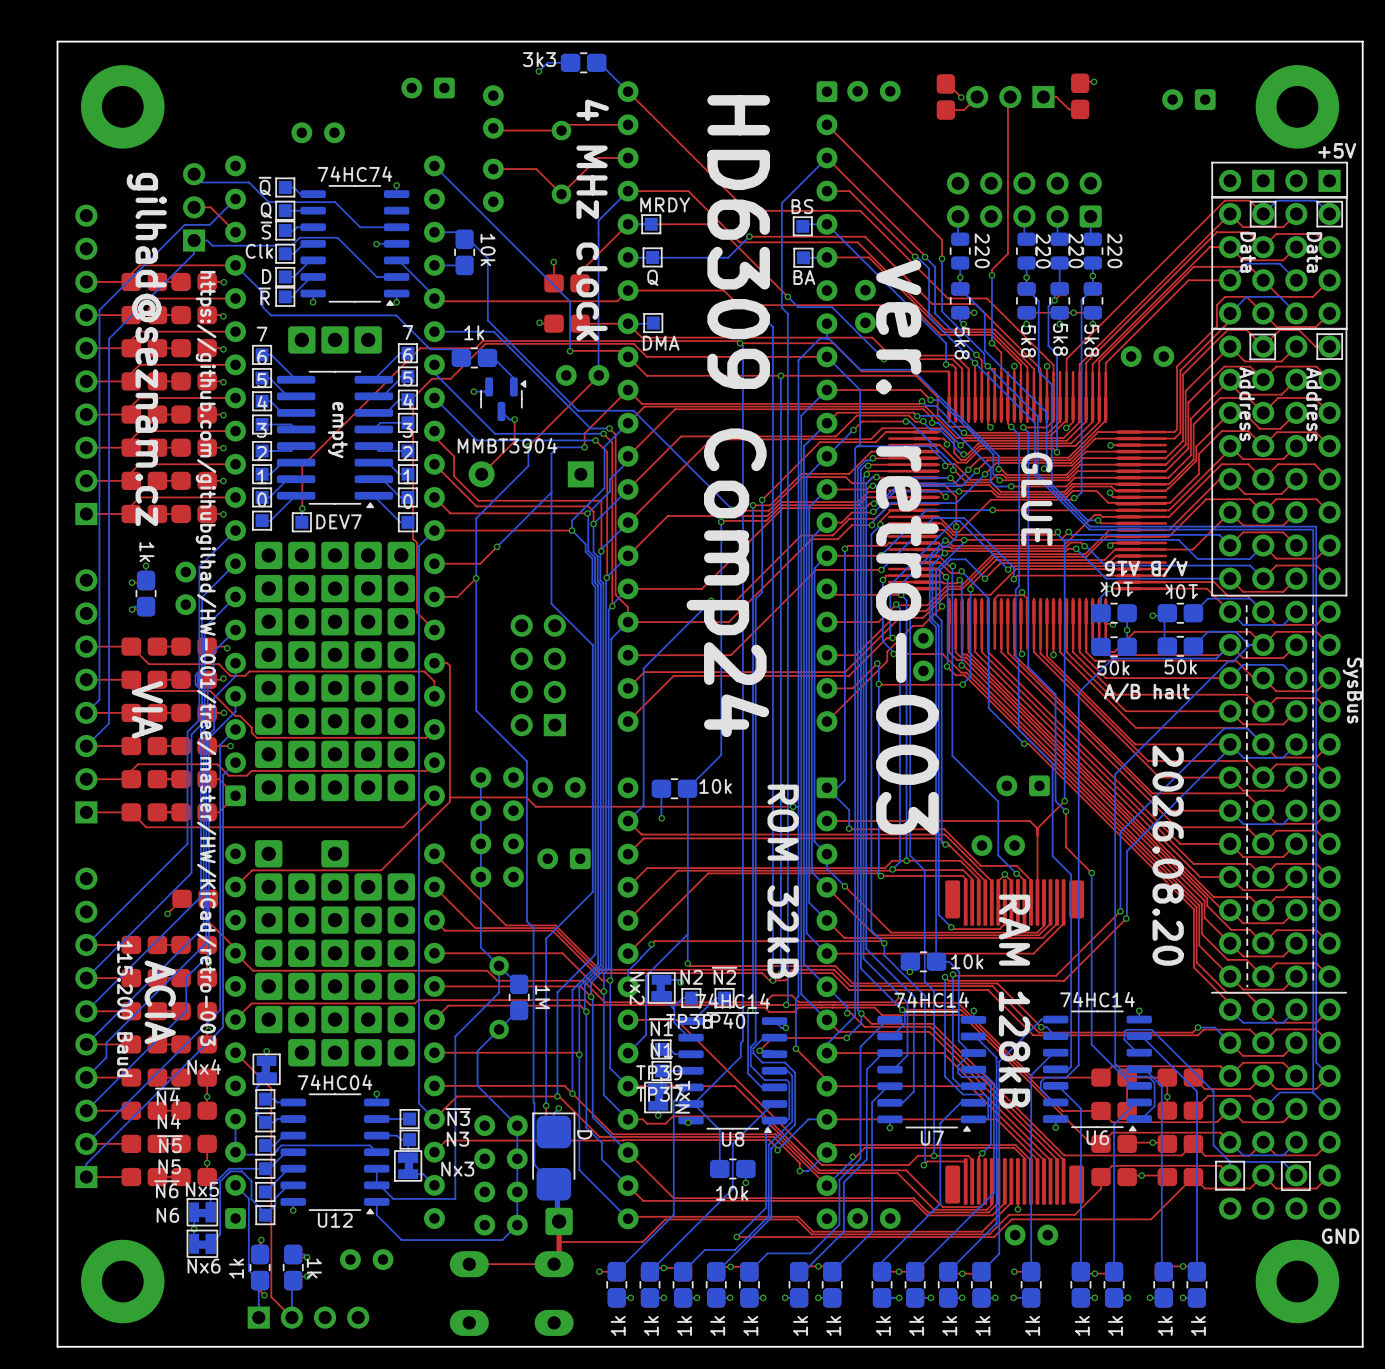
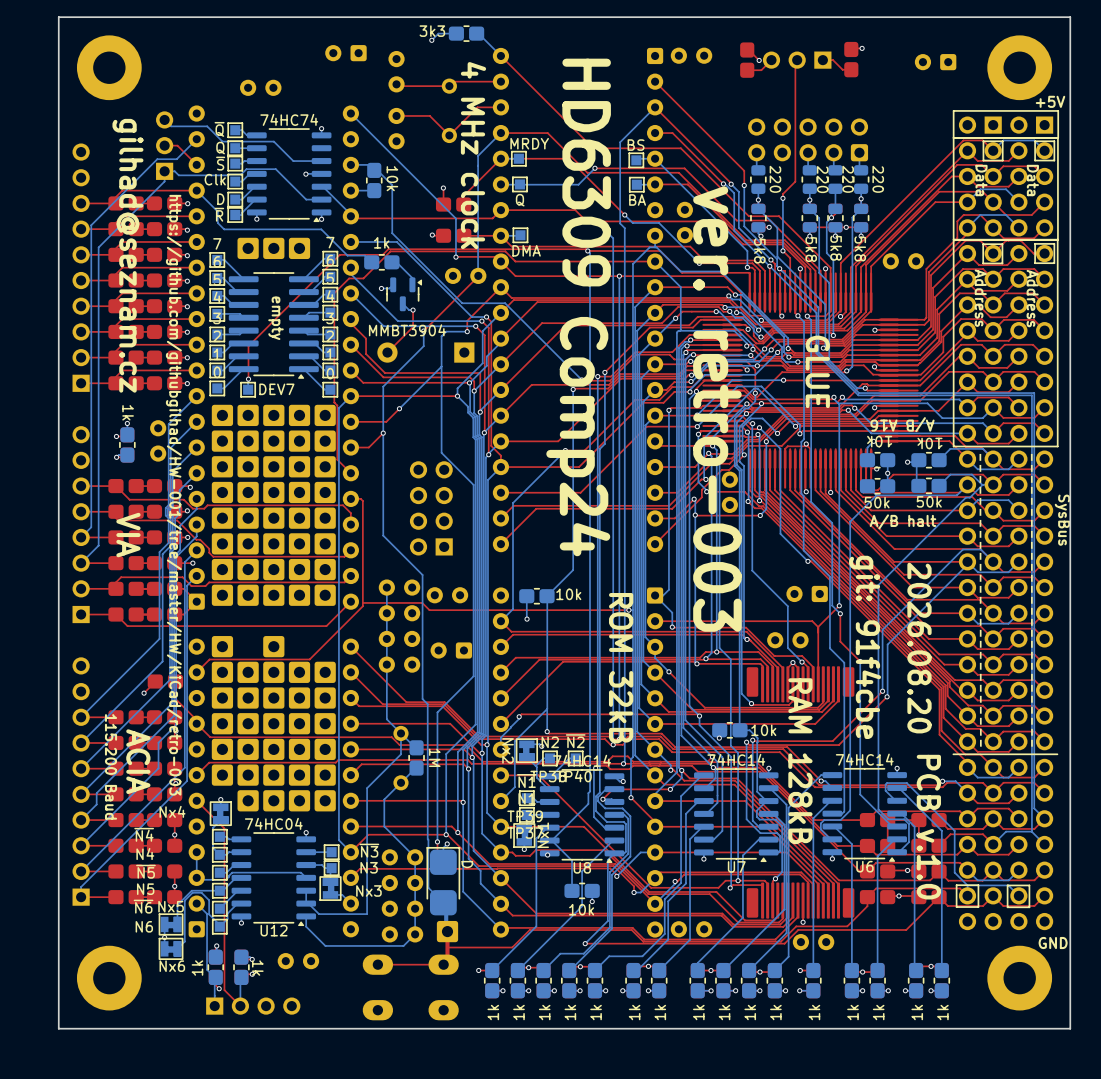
text: none -> git: 91f4cbe (865, 647)
text: none -> PCB v.1.0 (928, 827)

